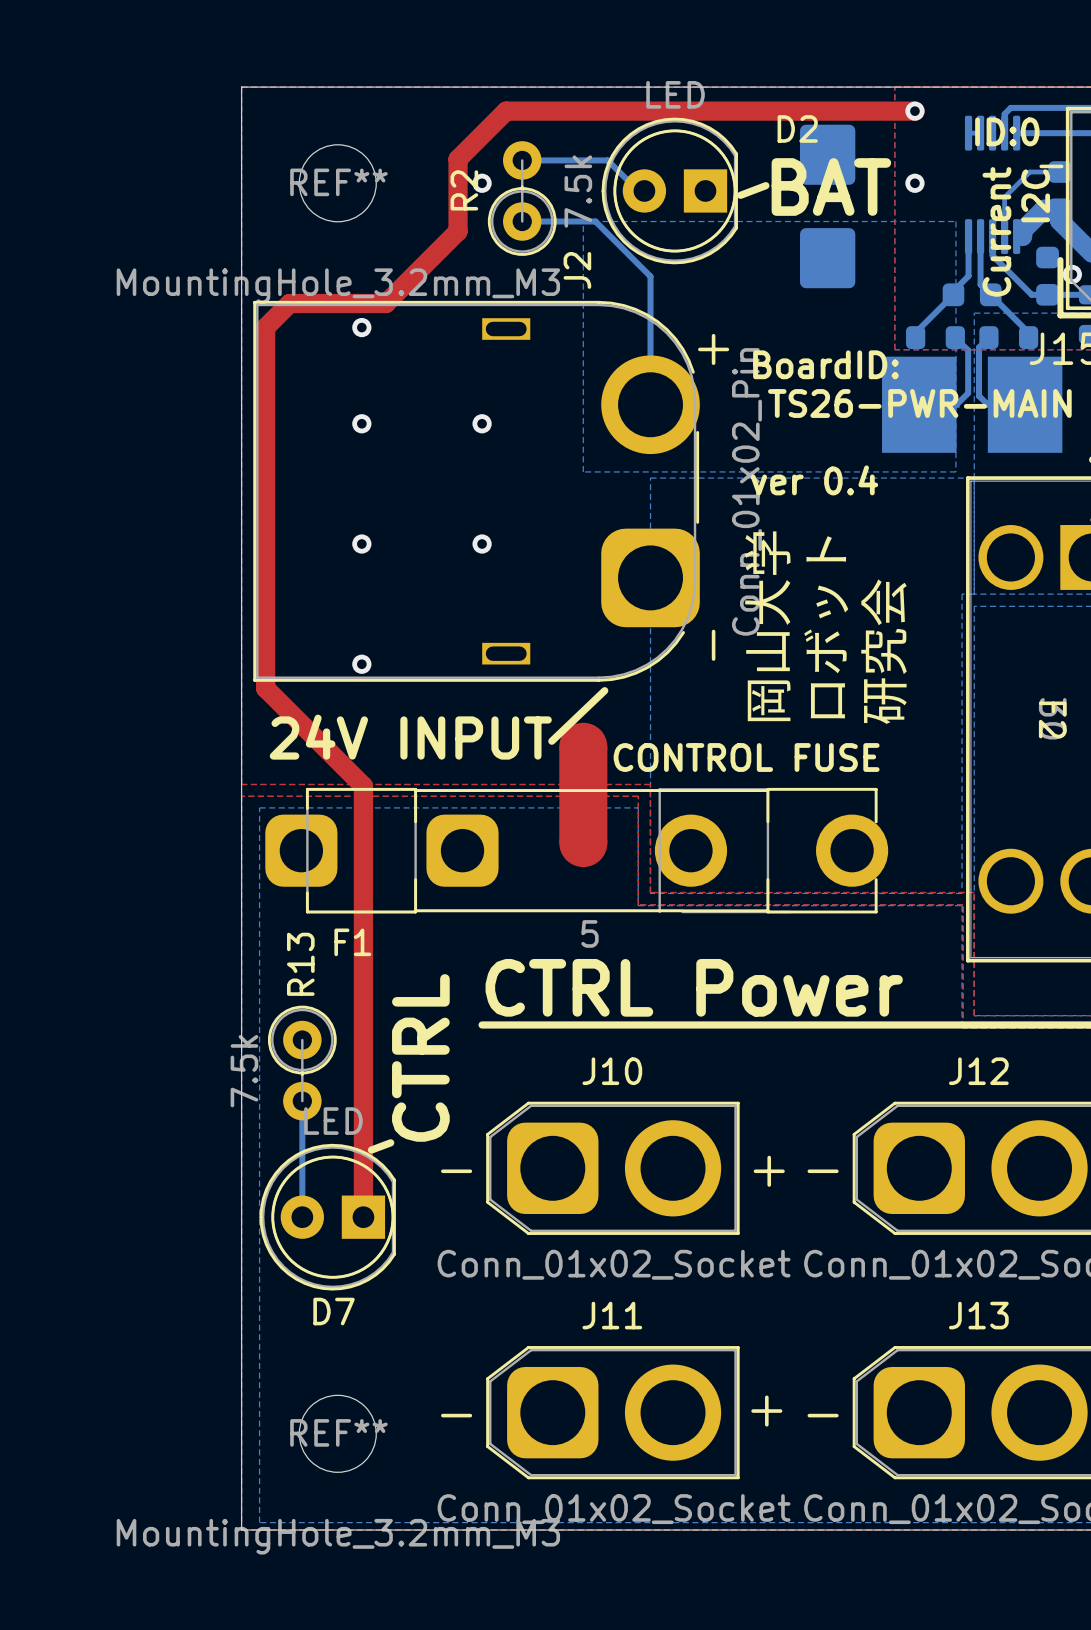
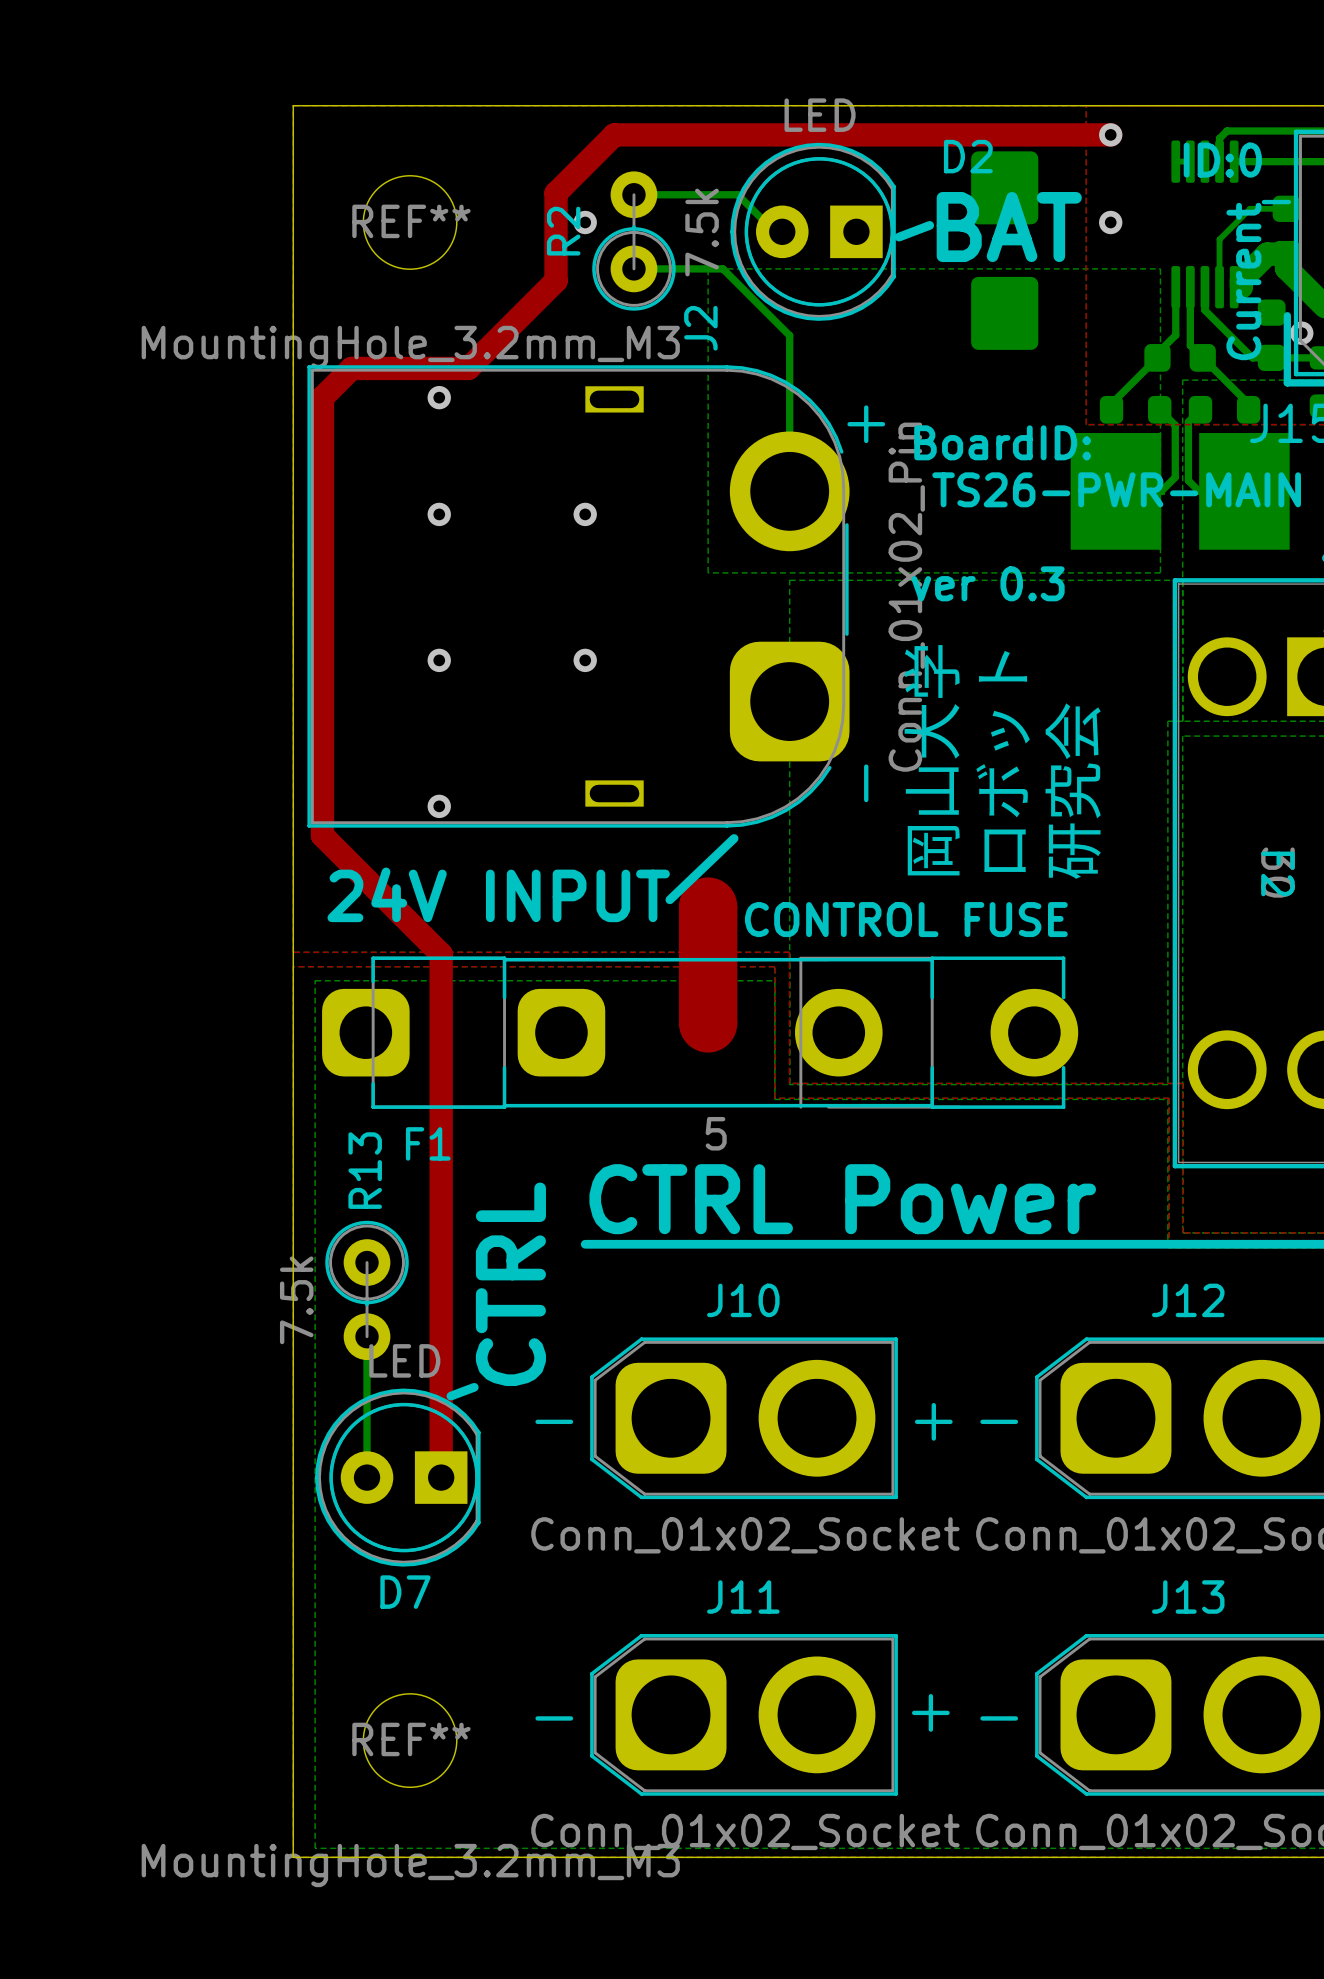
text: I2C (1035, 195) -> Current (1243, 281)
text: Current (996, 231) -> none
text: ver 0.4 (814, 480) -> ver 0.3 (988, 583)

